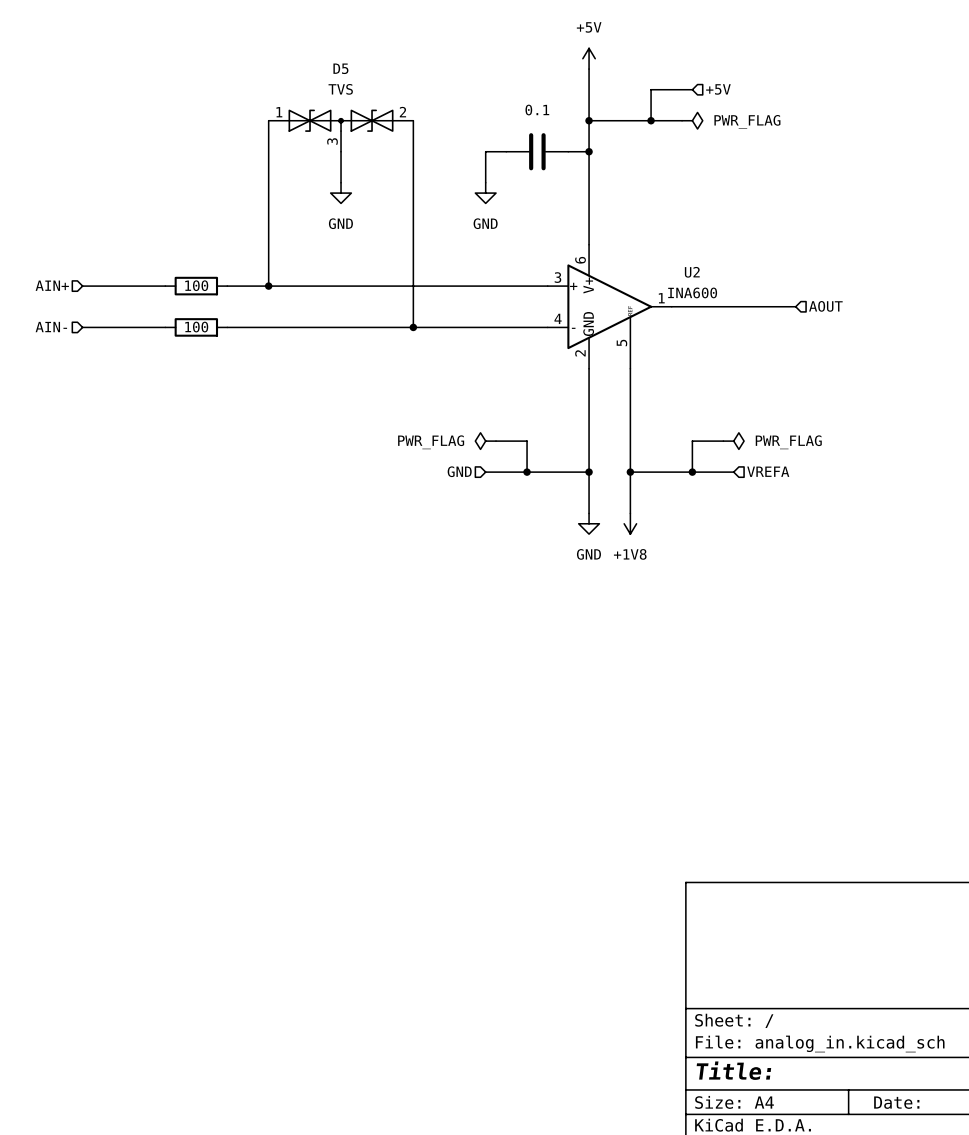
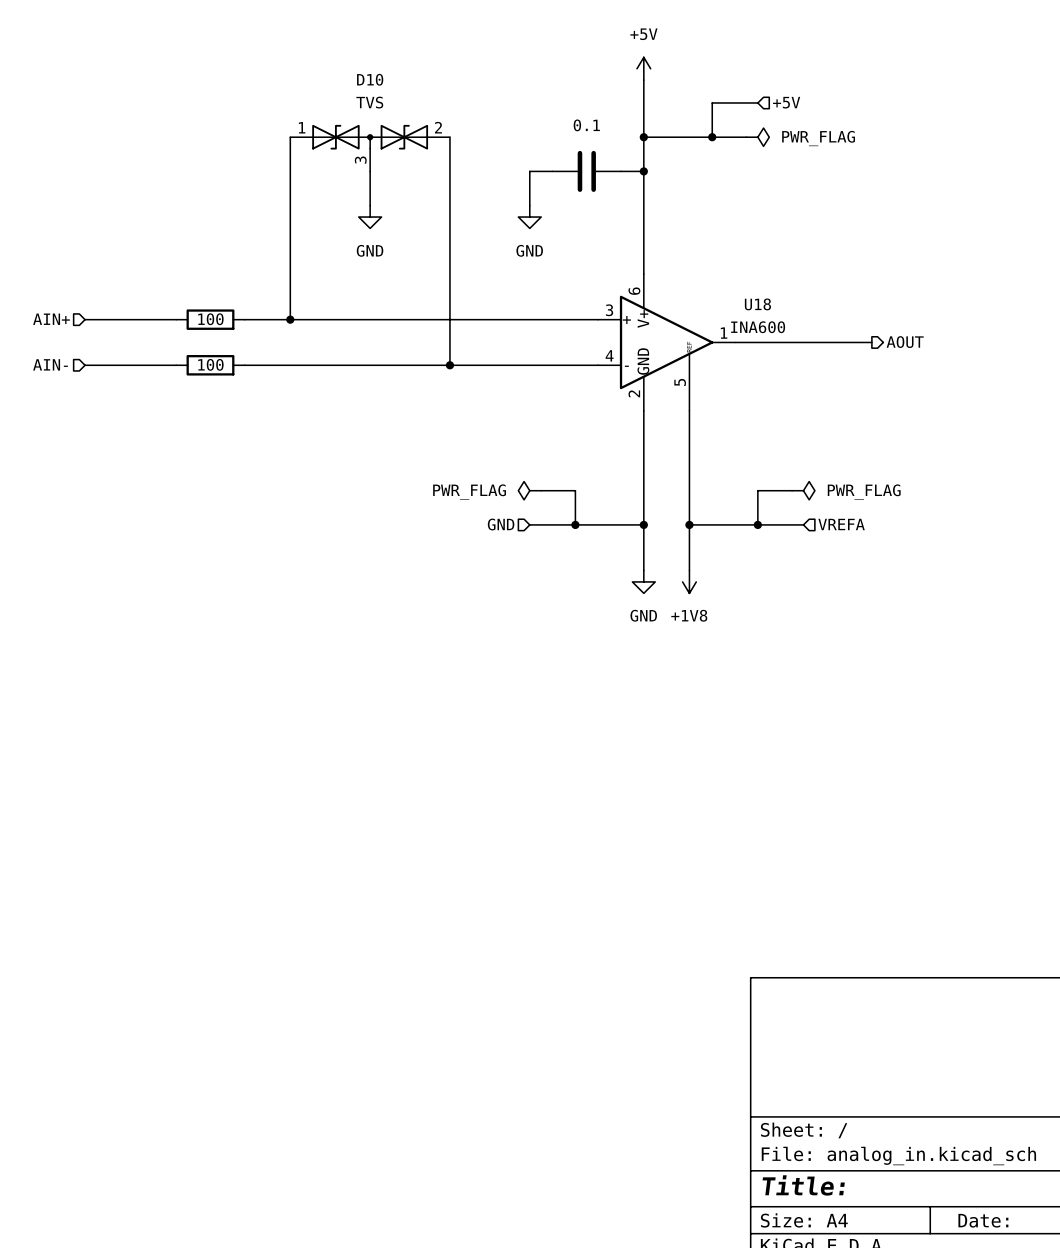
D5 name: D5 (340, 68) -> D10 (370, 79)
U2 name: U2 (692, 272) -> U18 (757, 304)
hierarchical label shape: input (825, 306) -> output (905, 342)

